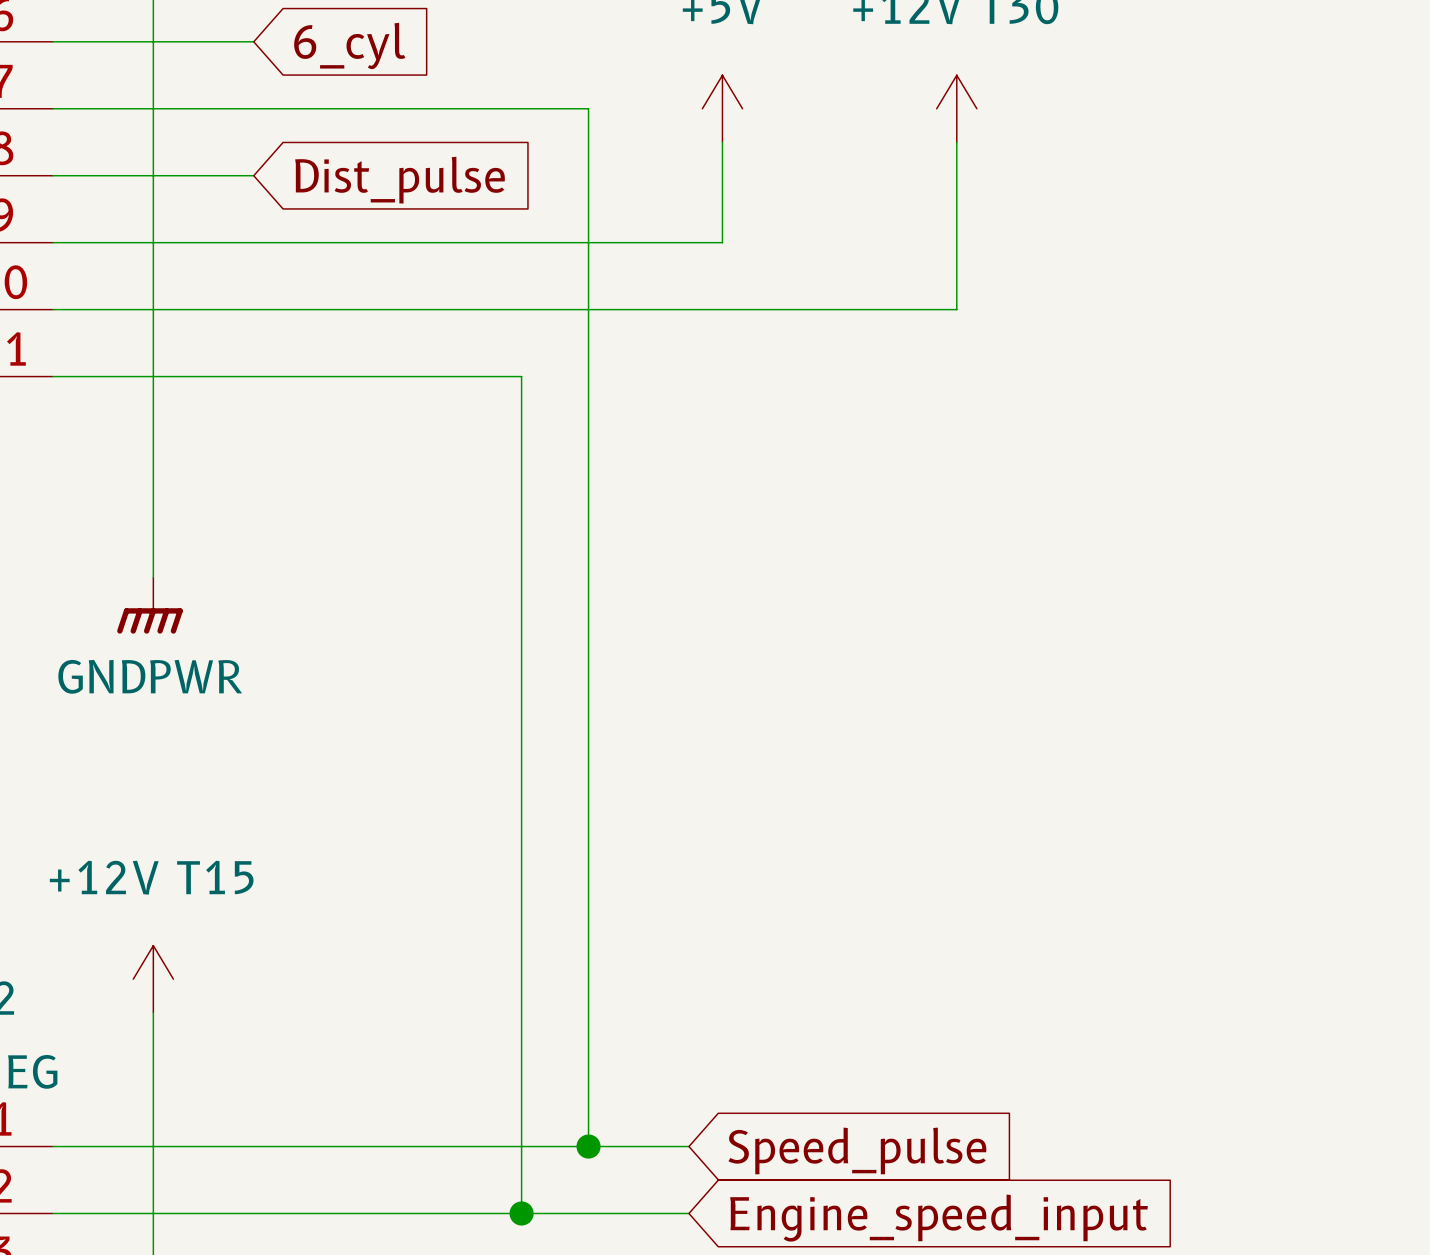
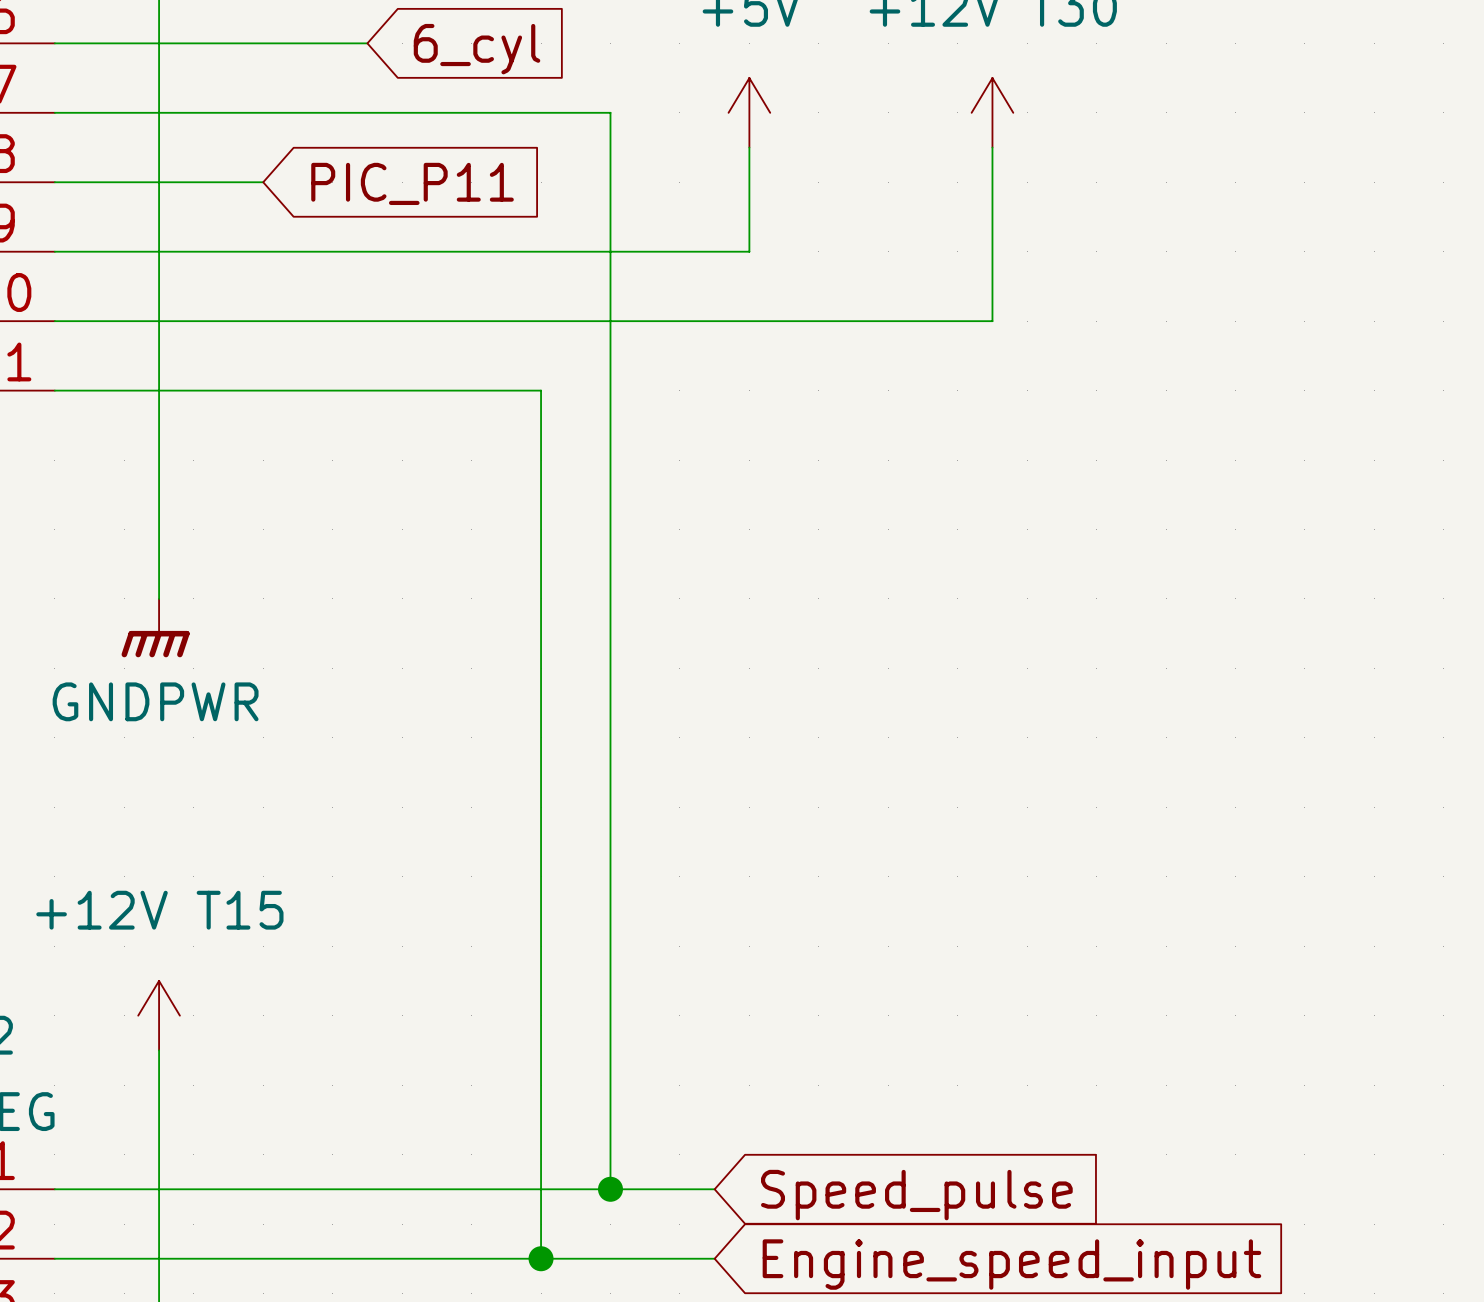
wire: none -> (263, 43) (367, 43)
global label position: 6_cyl (349, 45) -> 6_cyl (477, 49)
global label: Dist_pulse (400, 180) -> PIC_P11 (412, 183)

